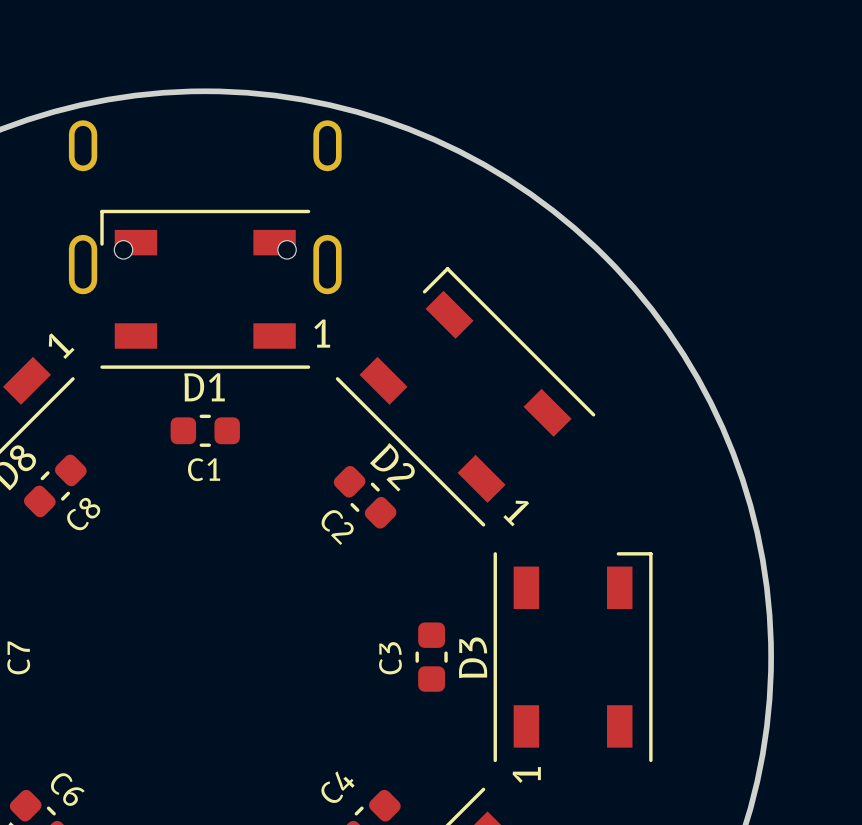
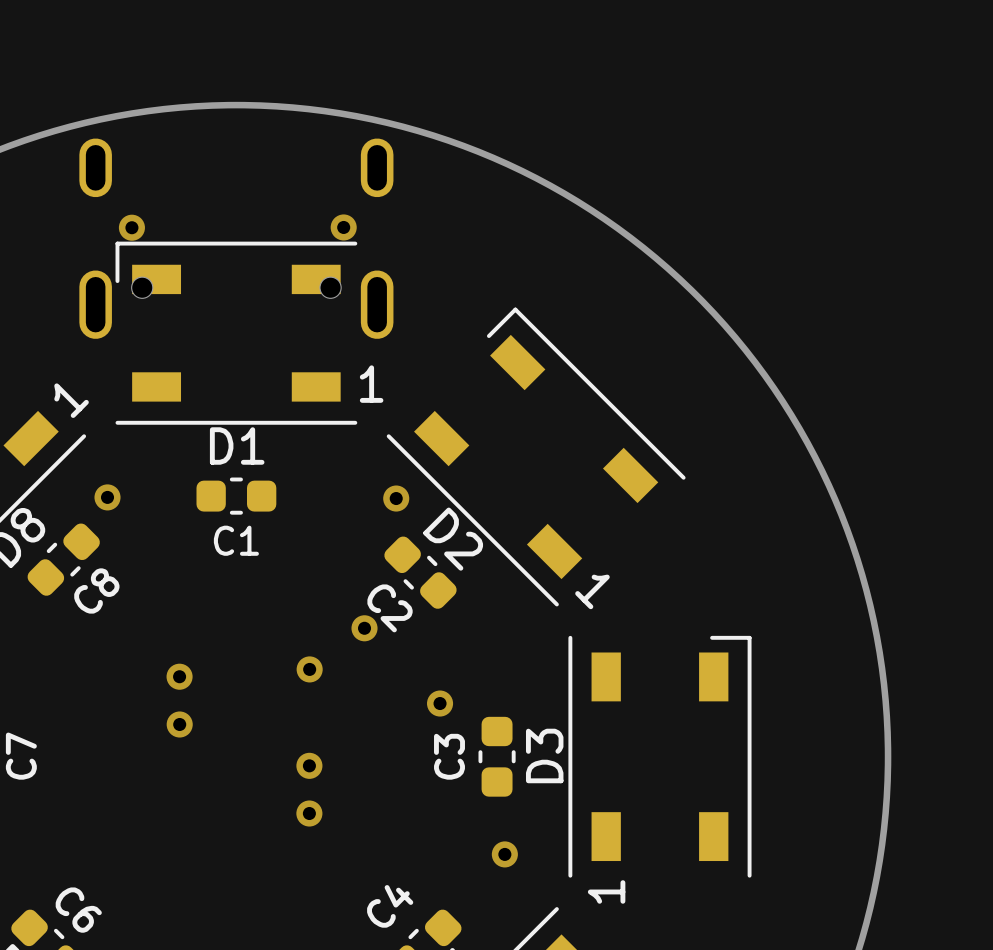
via: none -> (131, 227)
via: none -> (343, 227)
via: none -> (107, 497)
via: none -> (396, 498)
via: none -> (364, 628)
via: none -> (309, 669)
via: none -> (179, 676)
via: none -> (440, 703)
via: none -> (179, 724)
via: none -> (309, 765)
via: none -> (309, 813)
via: none -> (504, 854)

